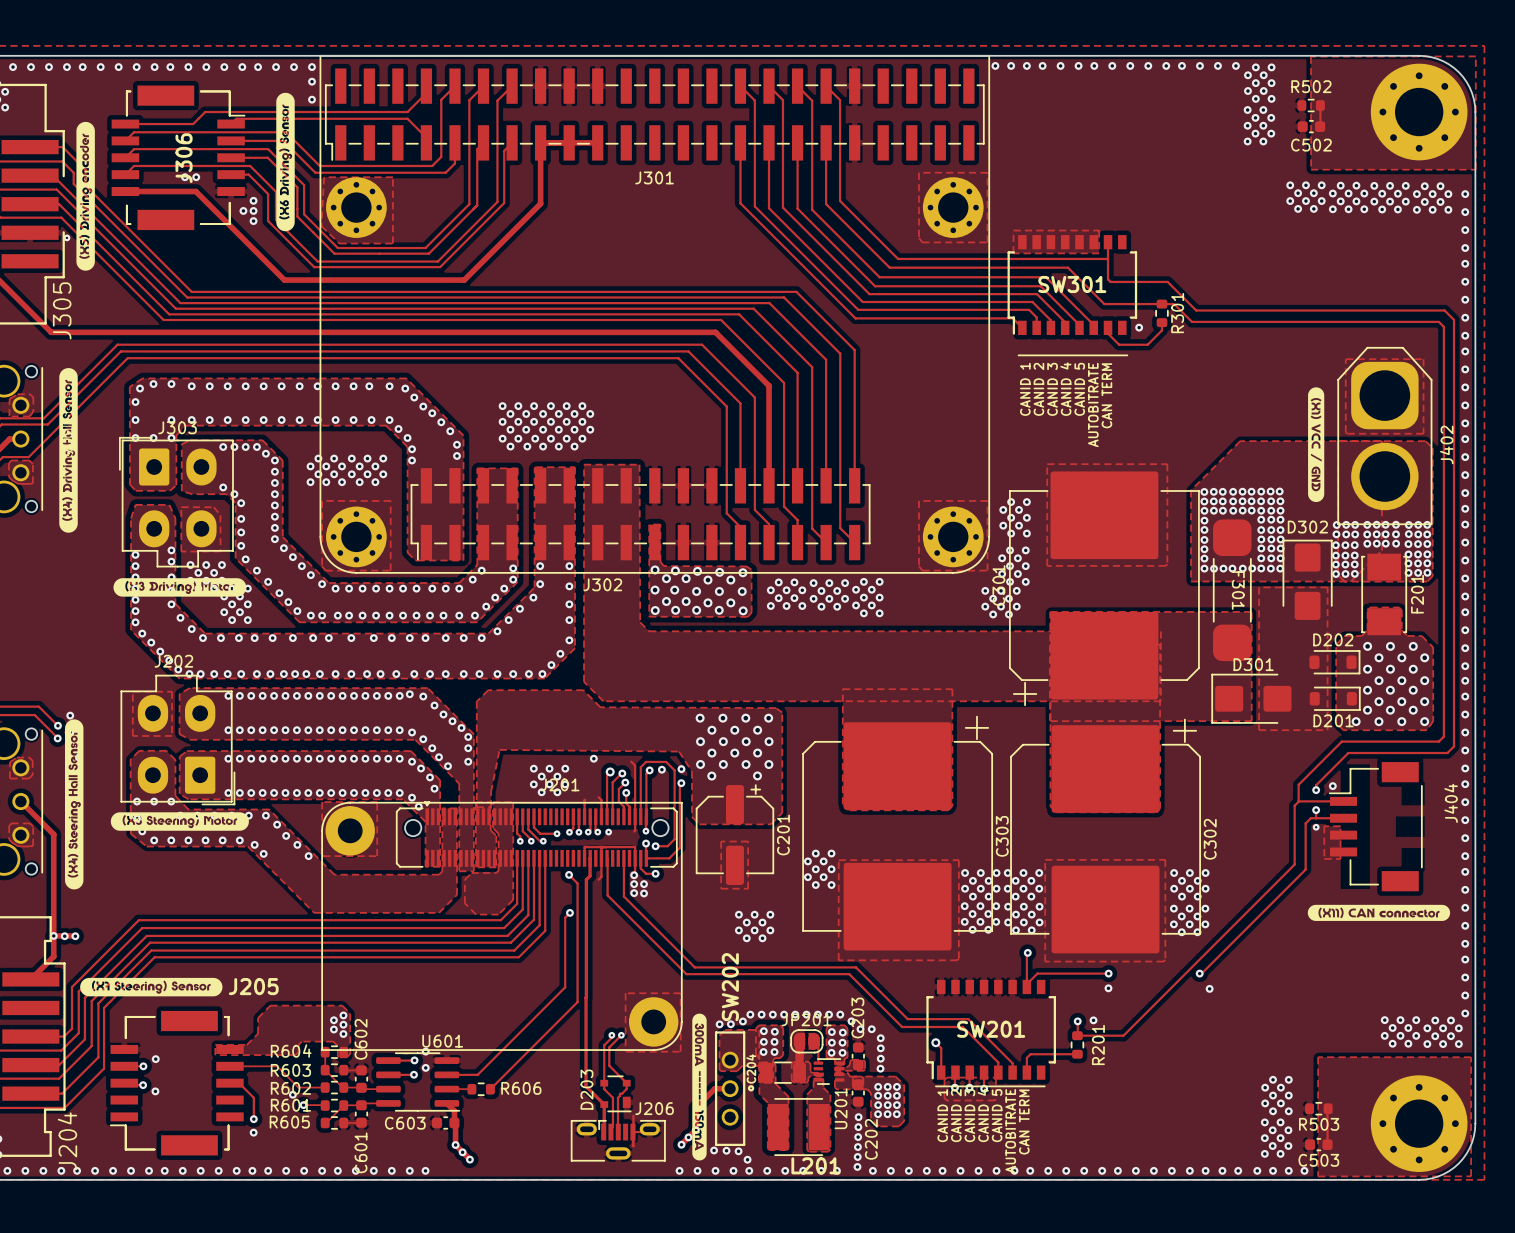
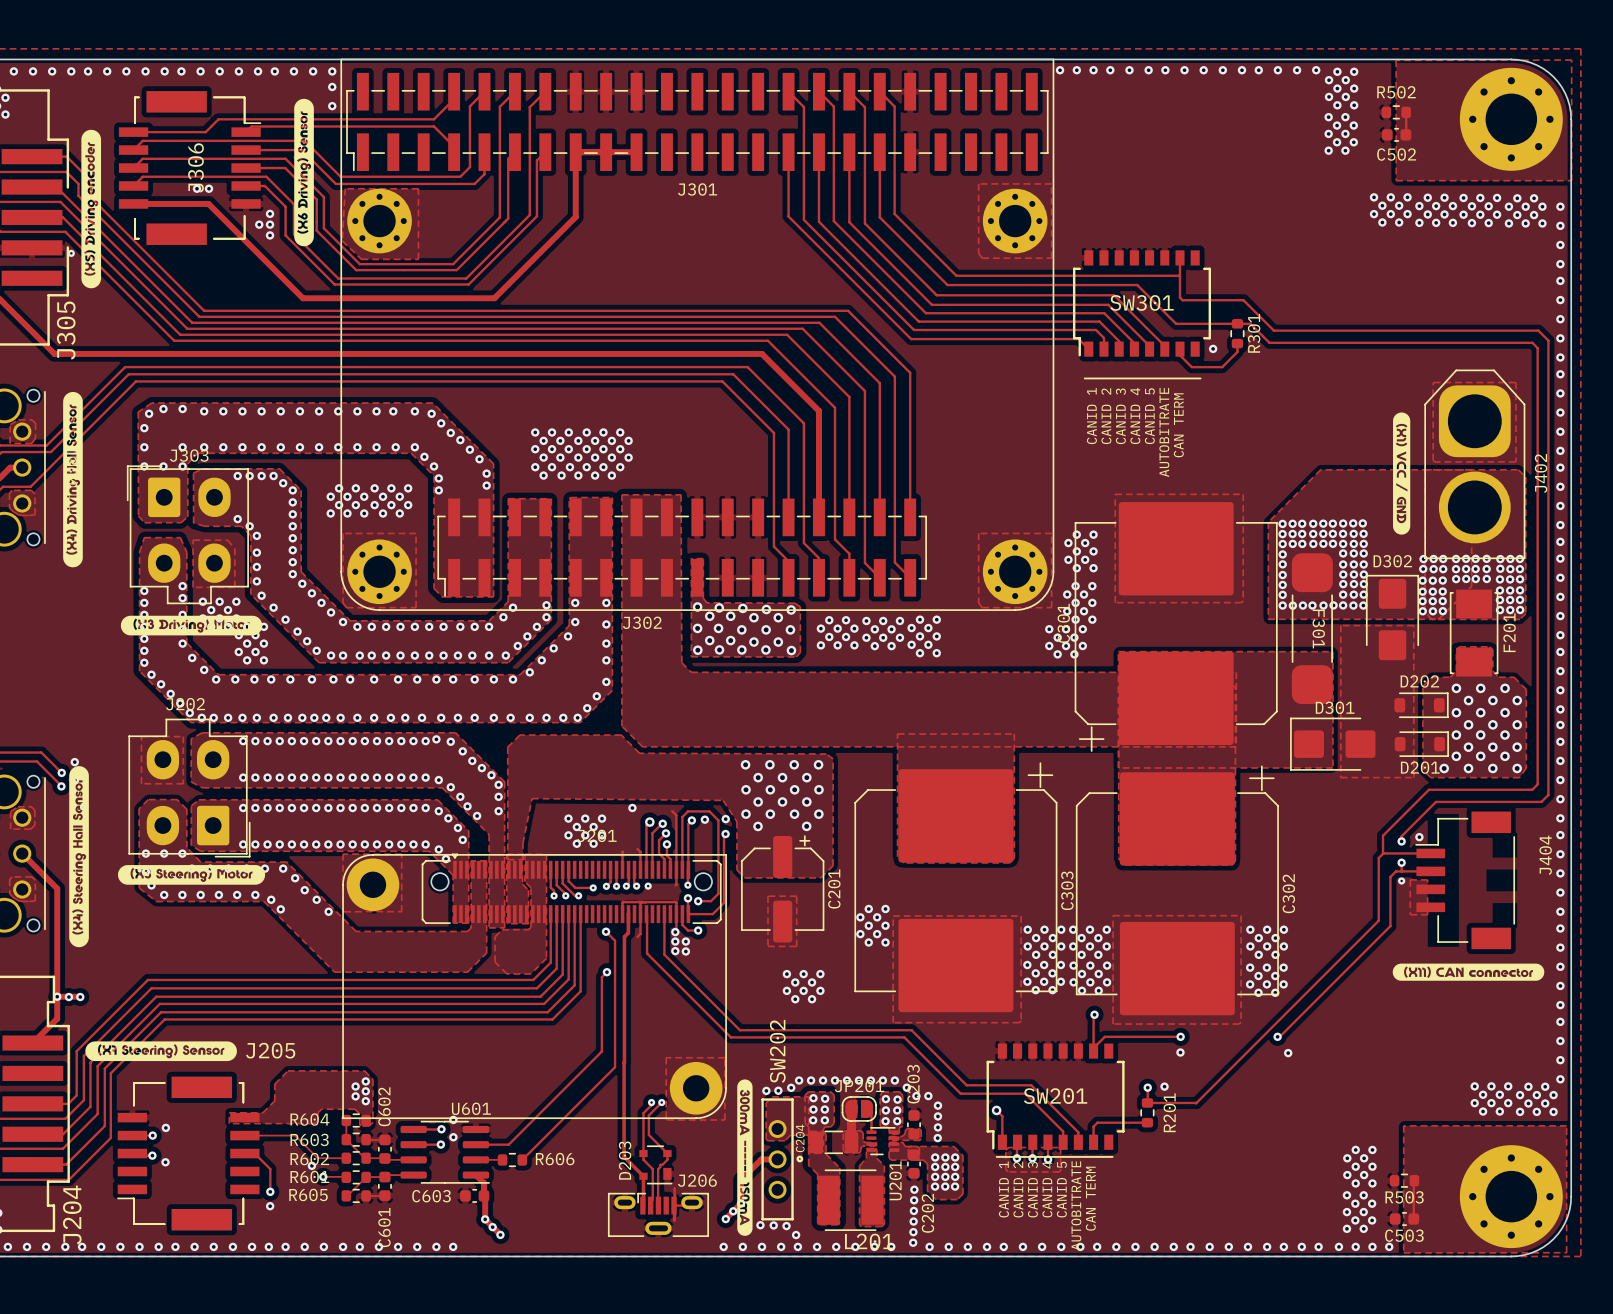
zone outline: (1013, 230) (1099, 230) (1099, 253) (1013, 253) (1013, 230) -> none

